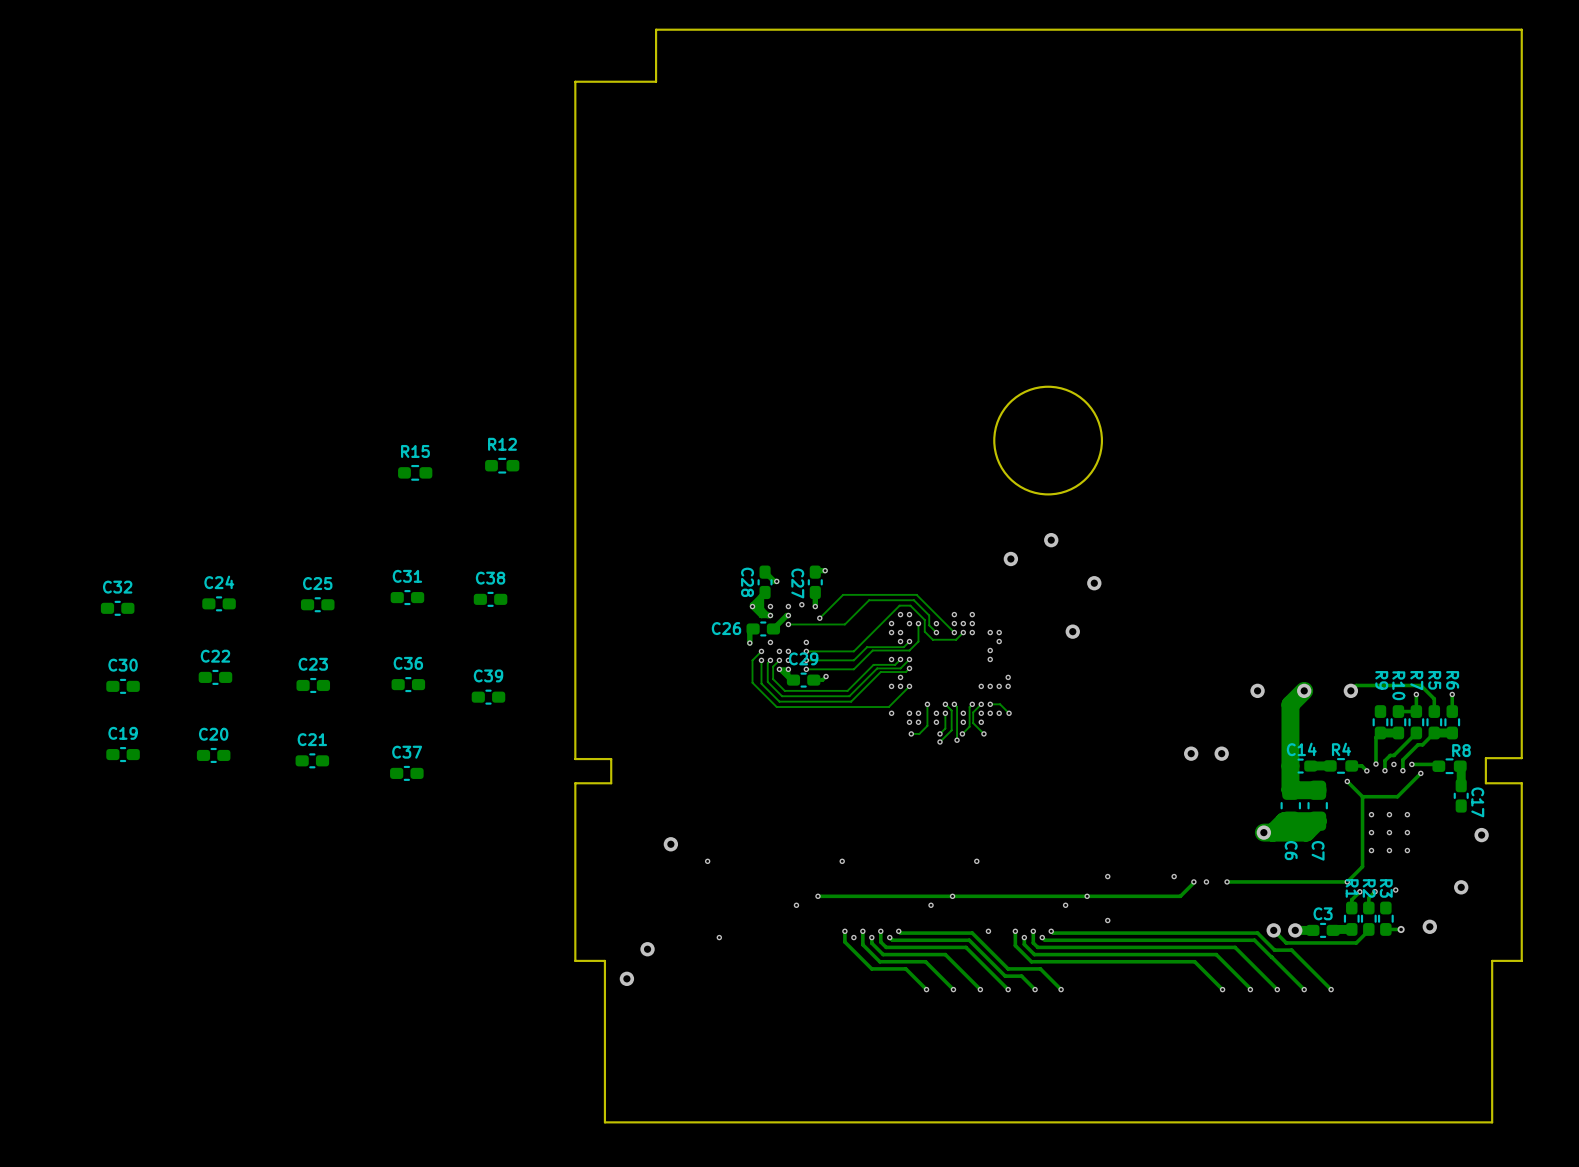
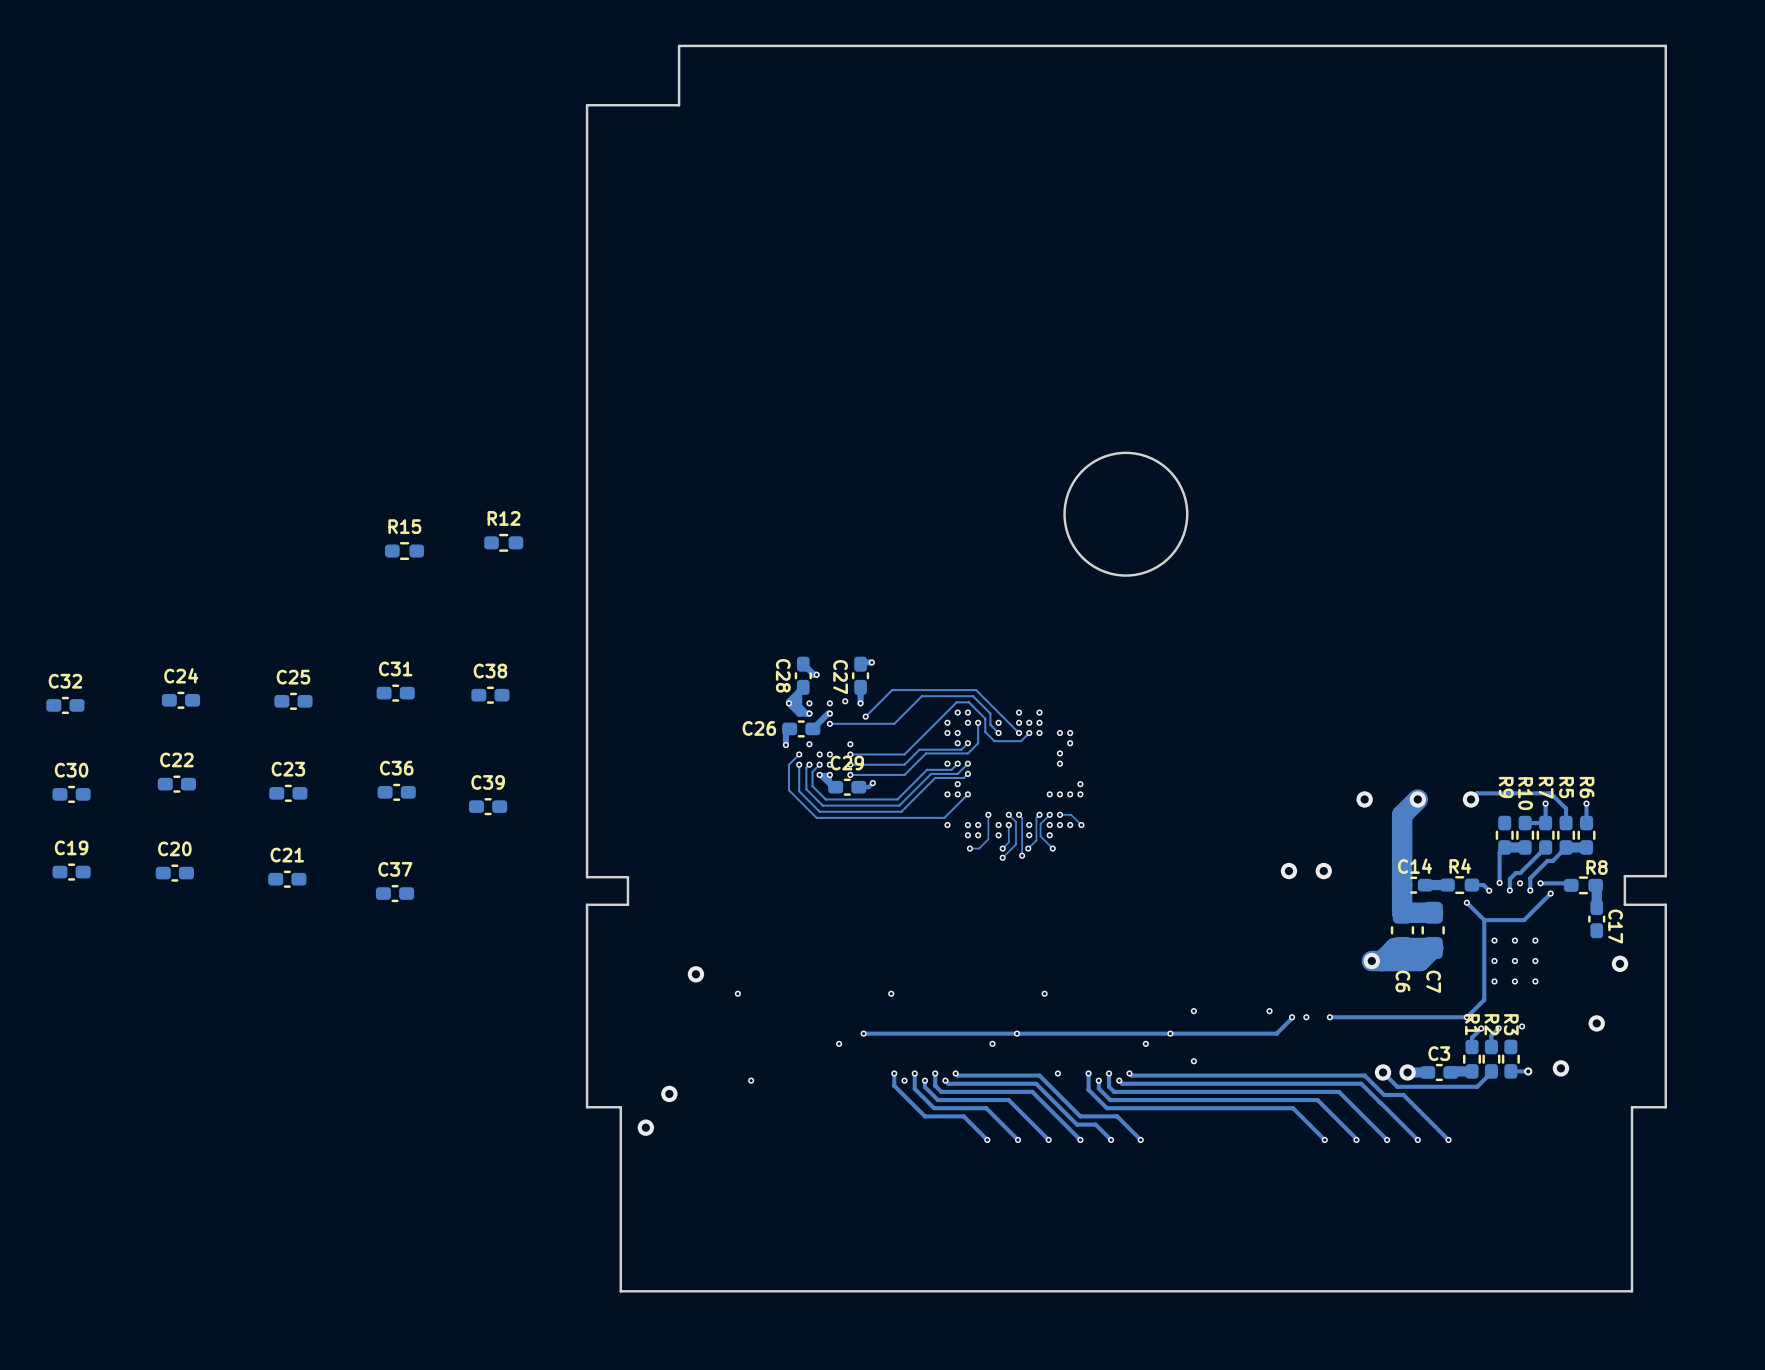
via: (1051, 540) -> none
via: (1010, 558) -> none
via: (1094, 583) -> none
via: (1072, 631) -> none

